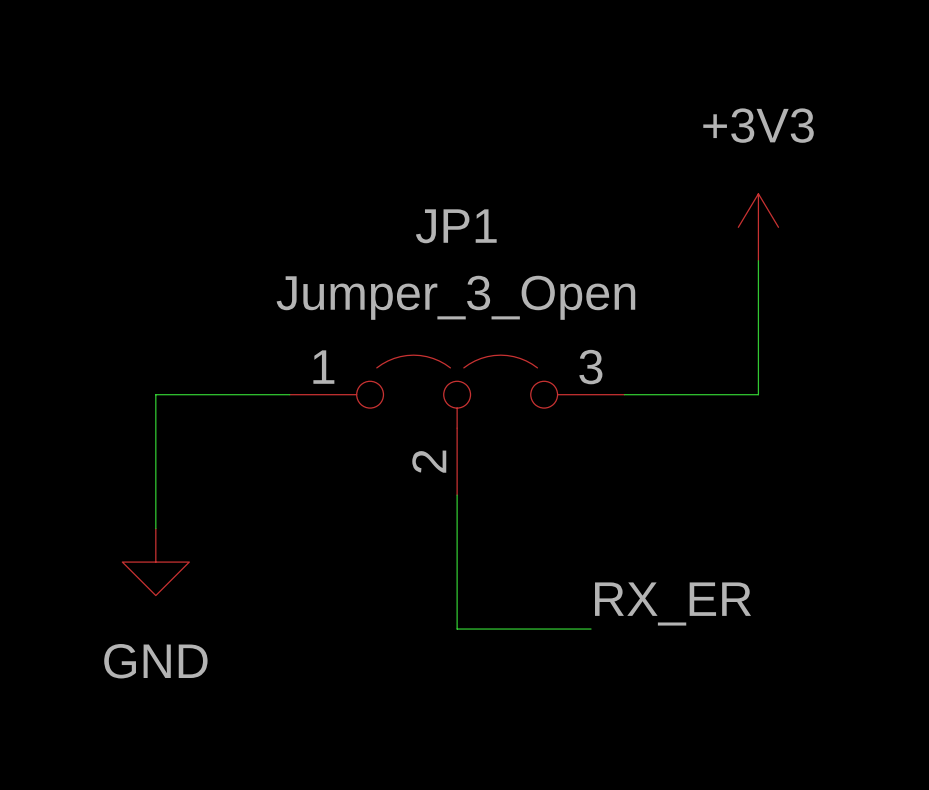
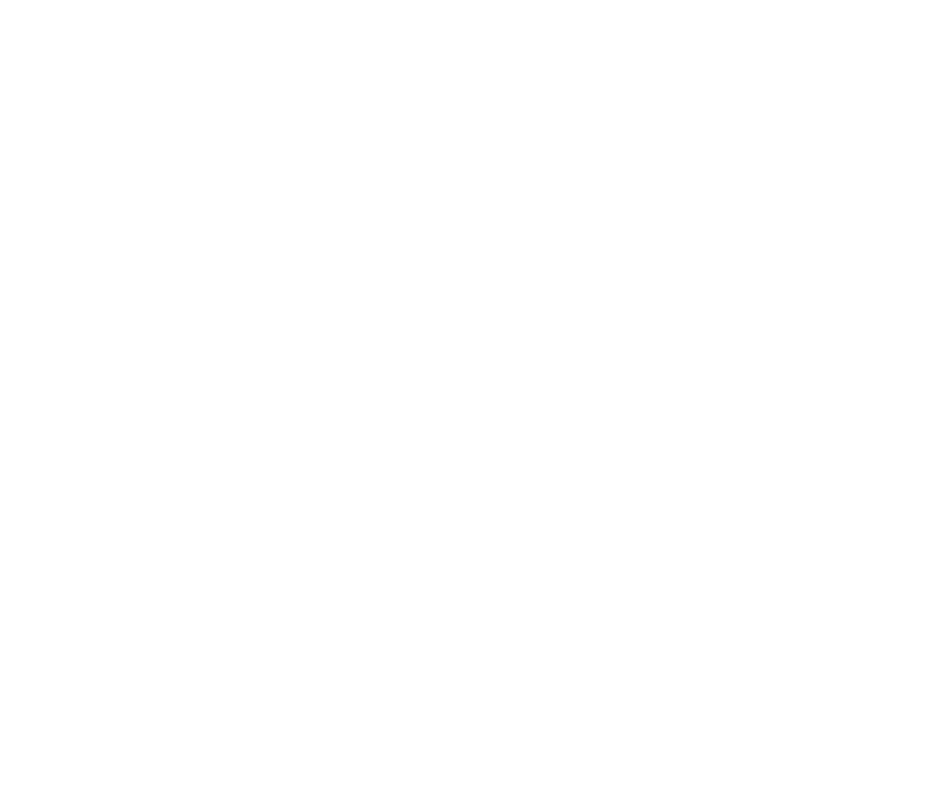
power symbol: +3V3 (758, 227) -> none
wire: (758, 260) (758, 394) (624, 394) -> none
wire: (289, 394) (155, 394) (155, 528) -> none
JP1: Jumper_3_Open (457, 425) -> none
wire: (457, 495) (457, 629) (591, 629) -> none
power symbol: GND (155, 562) -> none
label: RX_ER (673, 603) -> none

